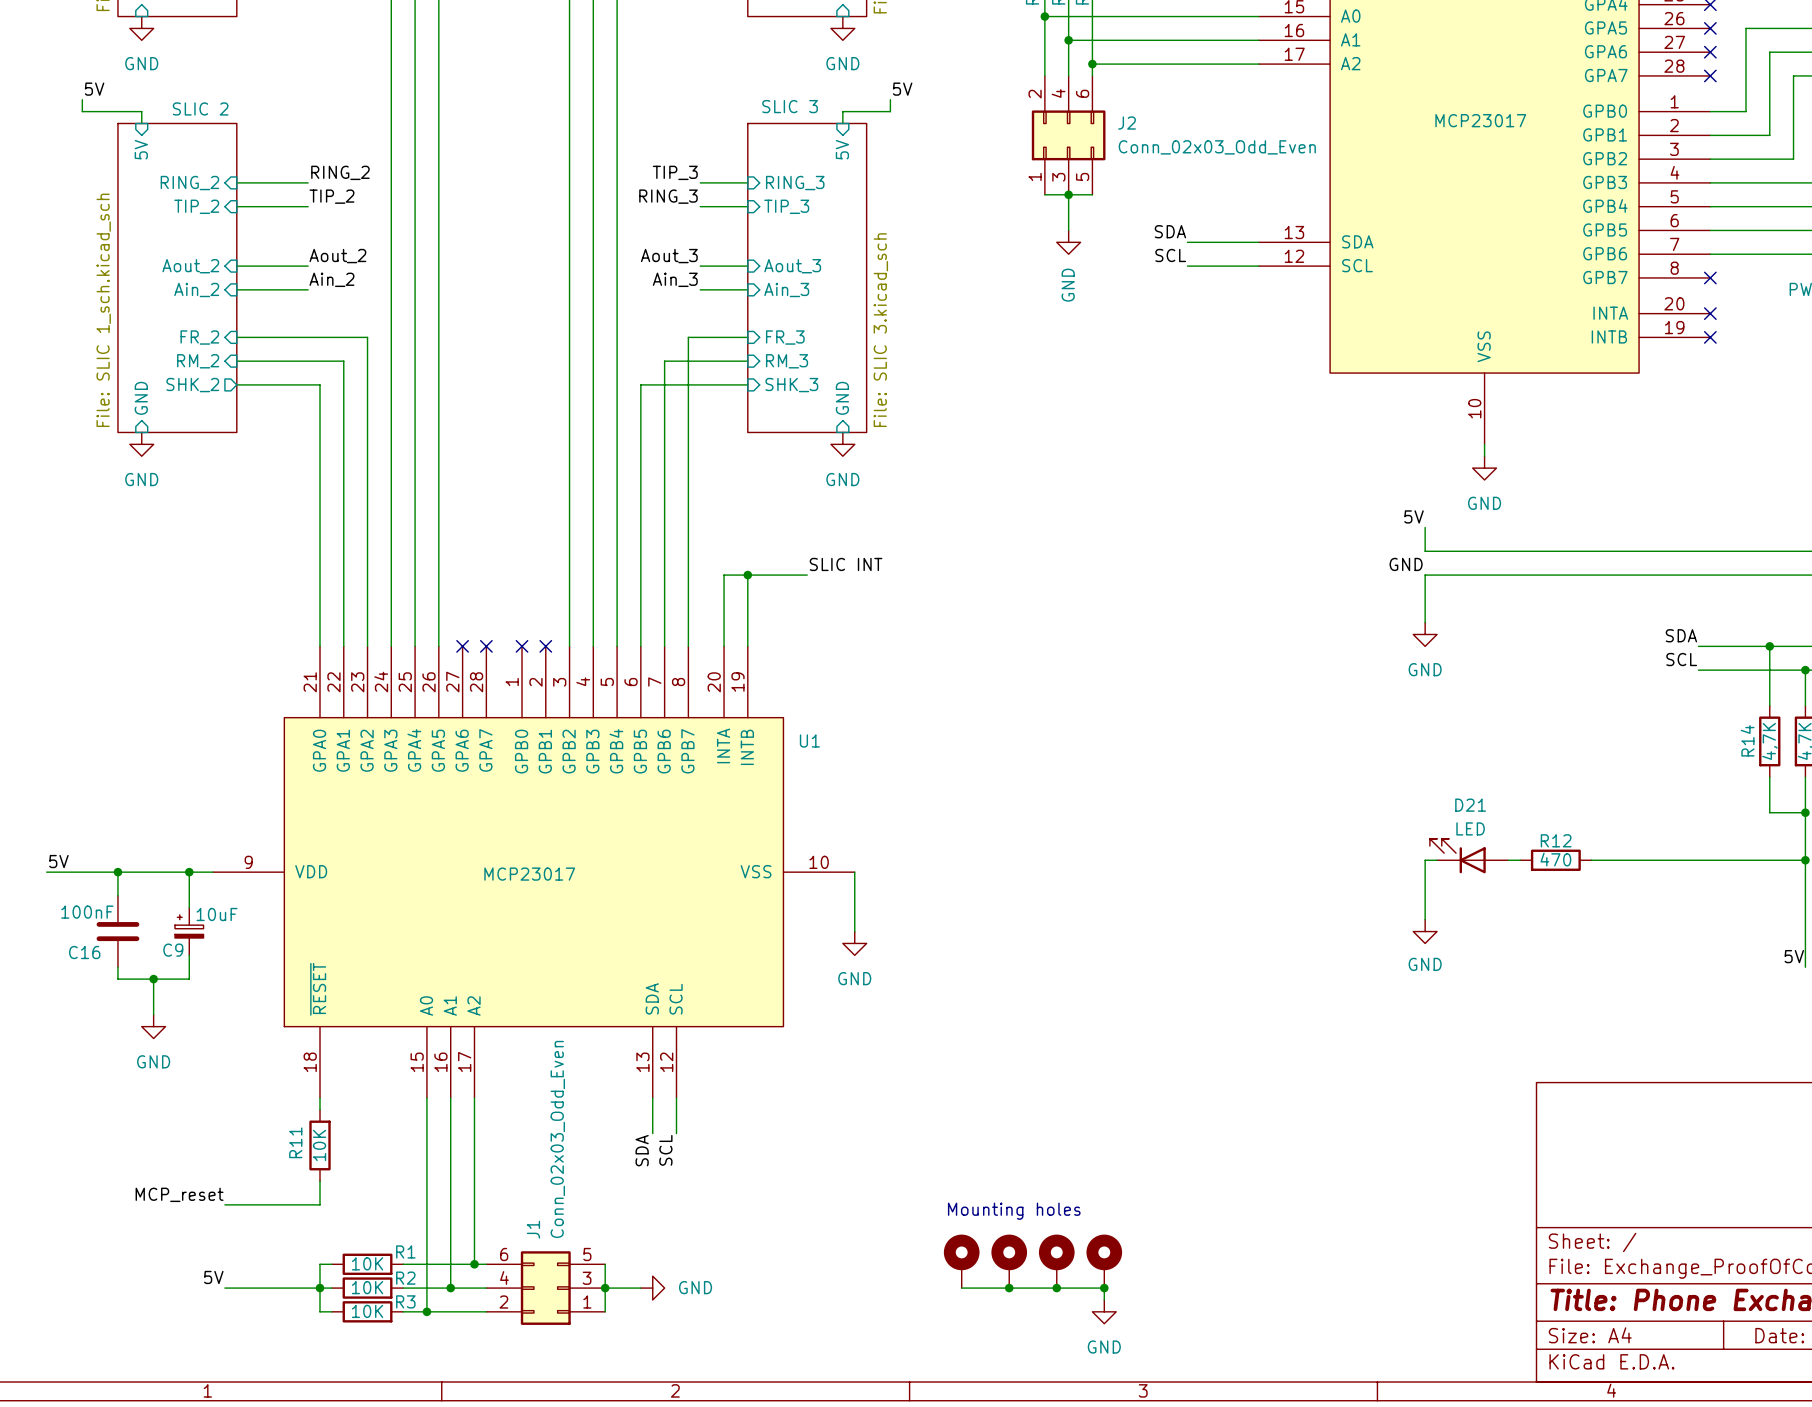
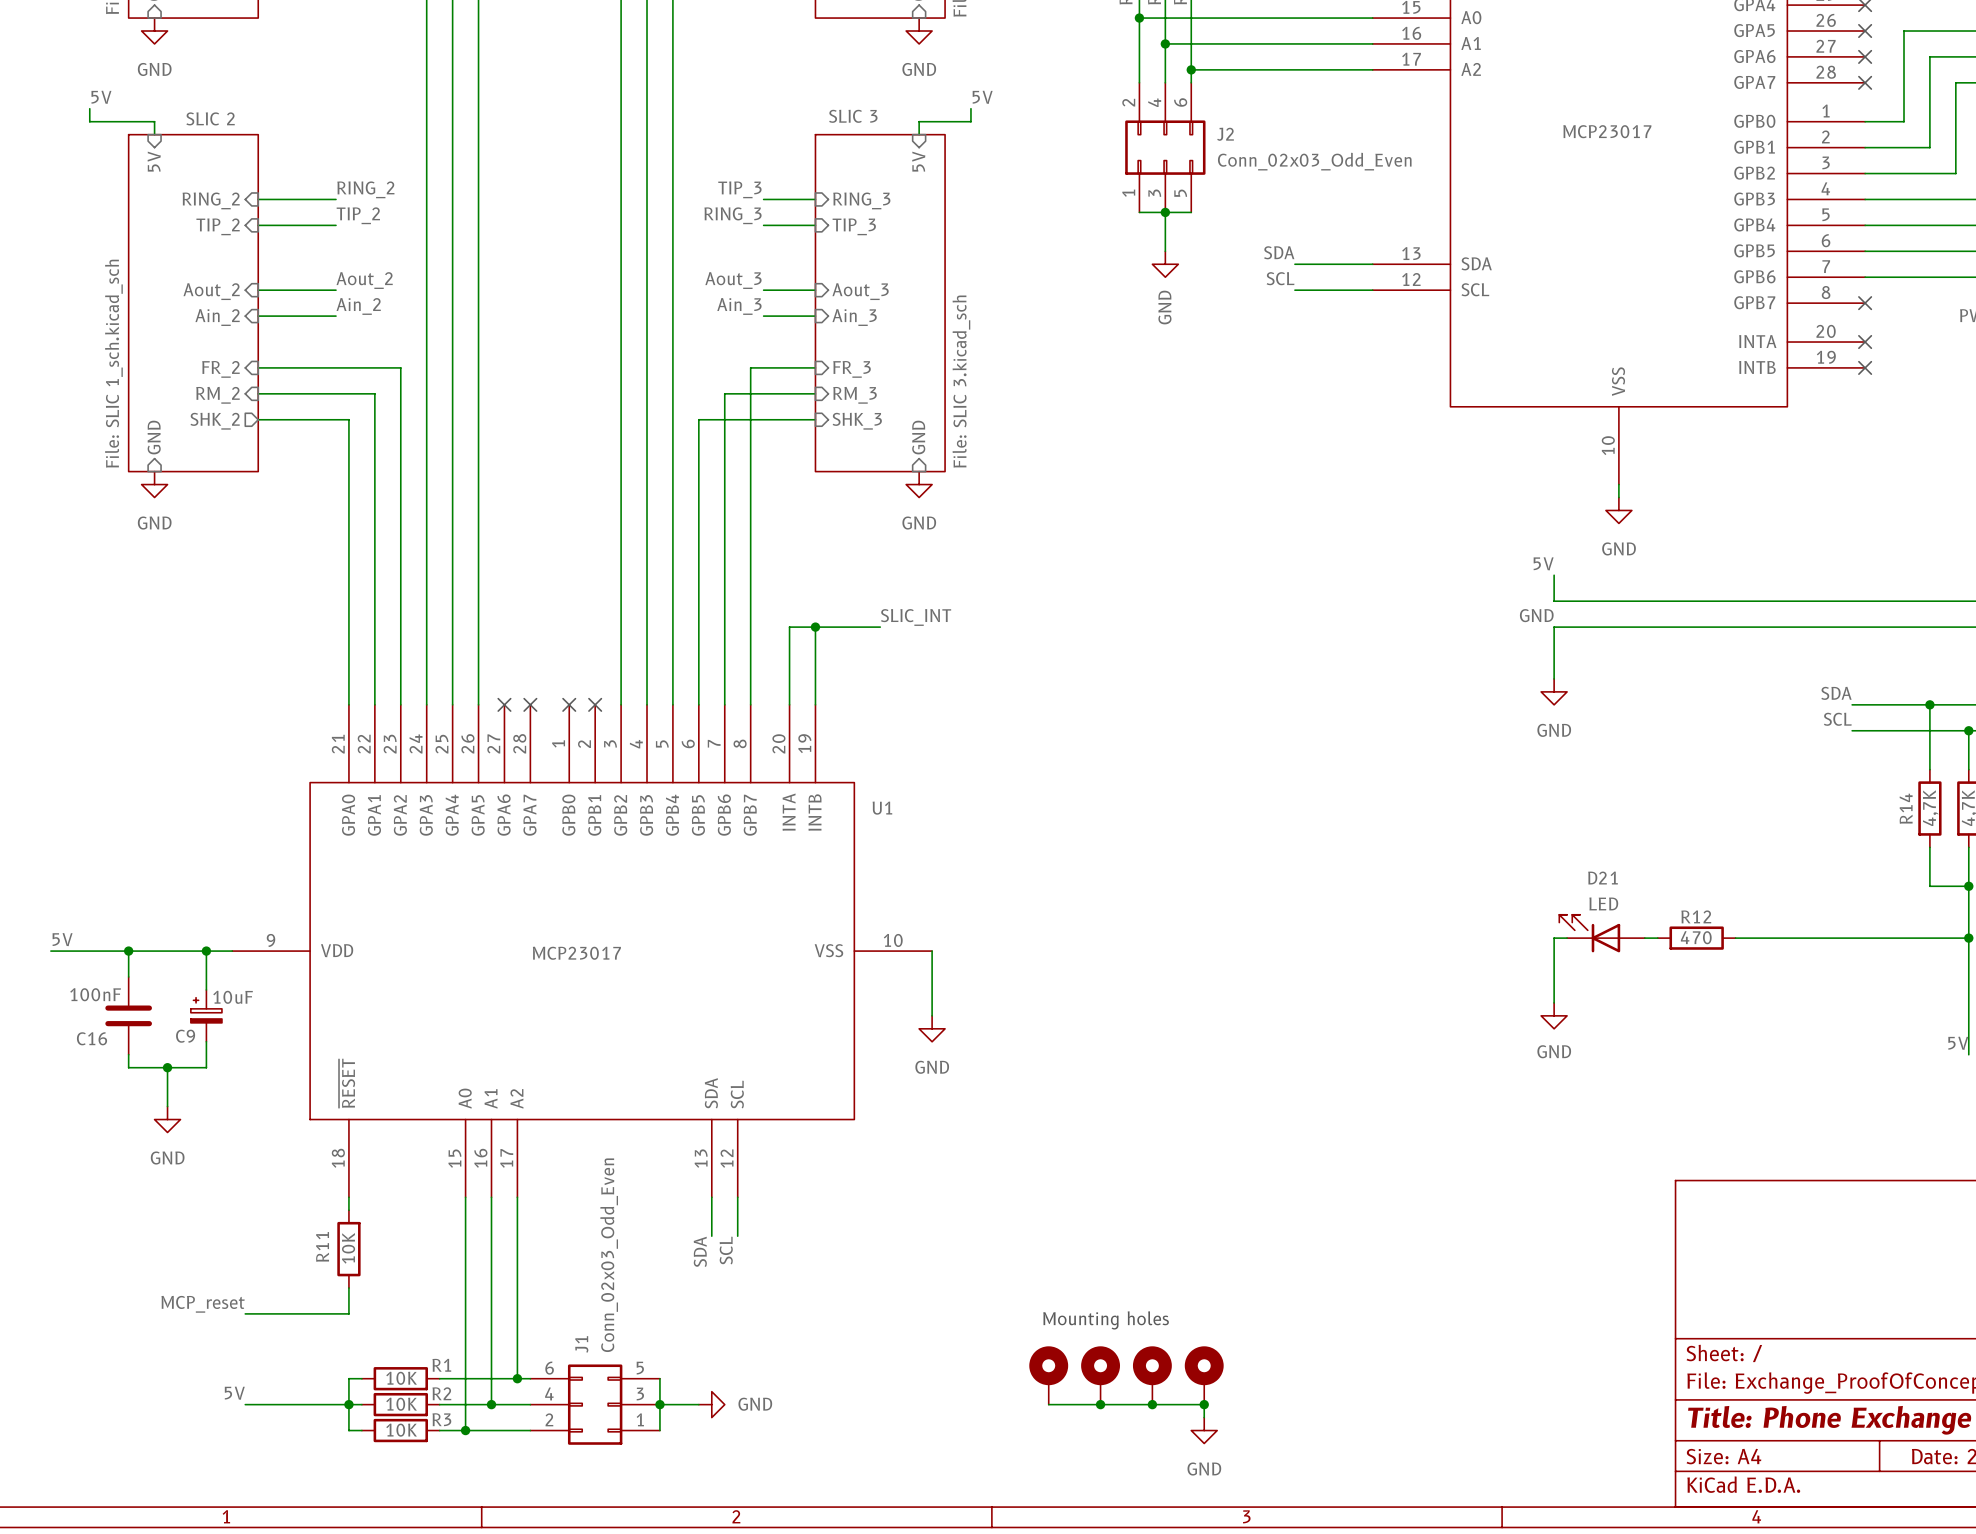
label: SLIC INT (846, 564) -> SLIC_INT (916, 617)

